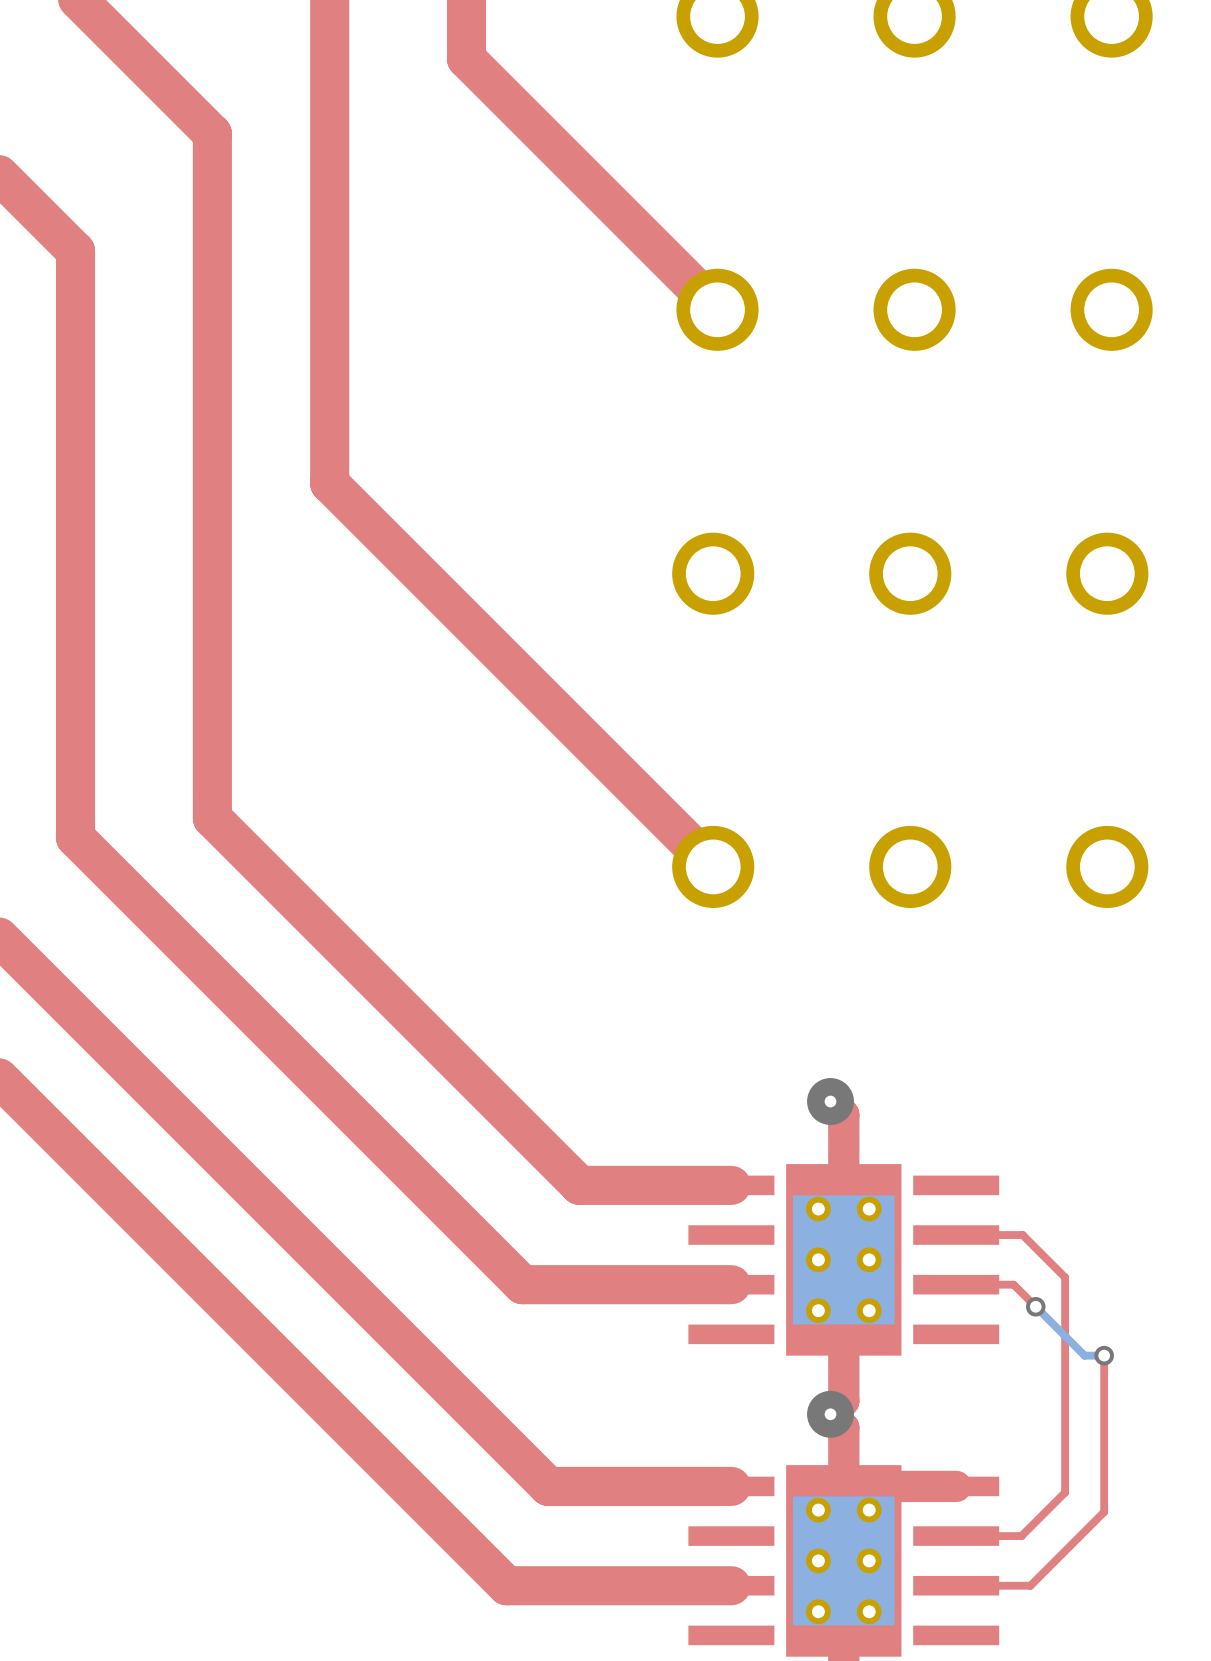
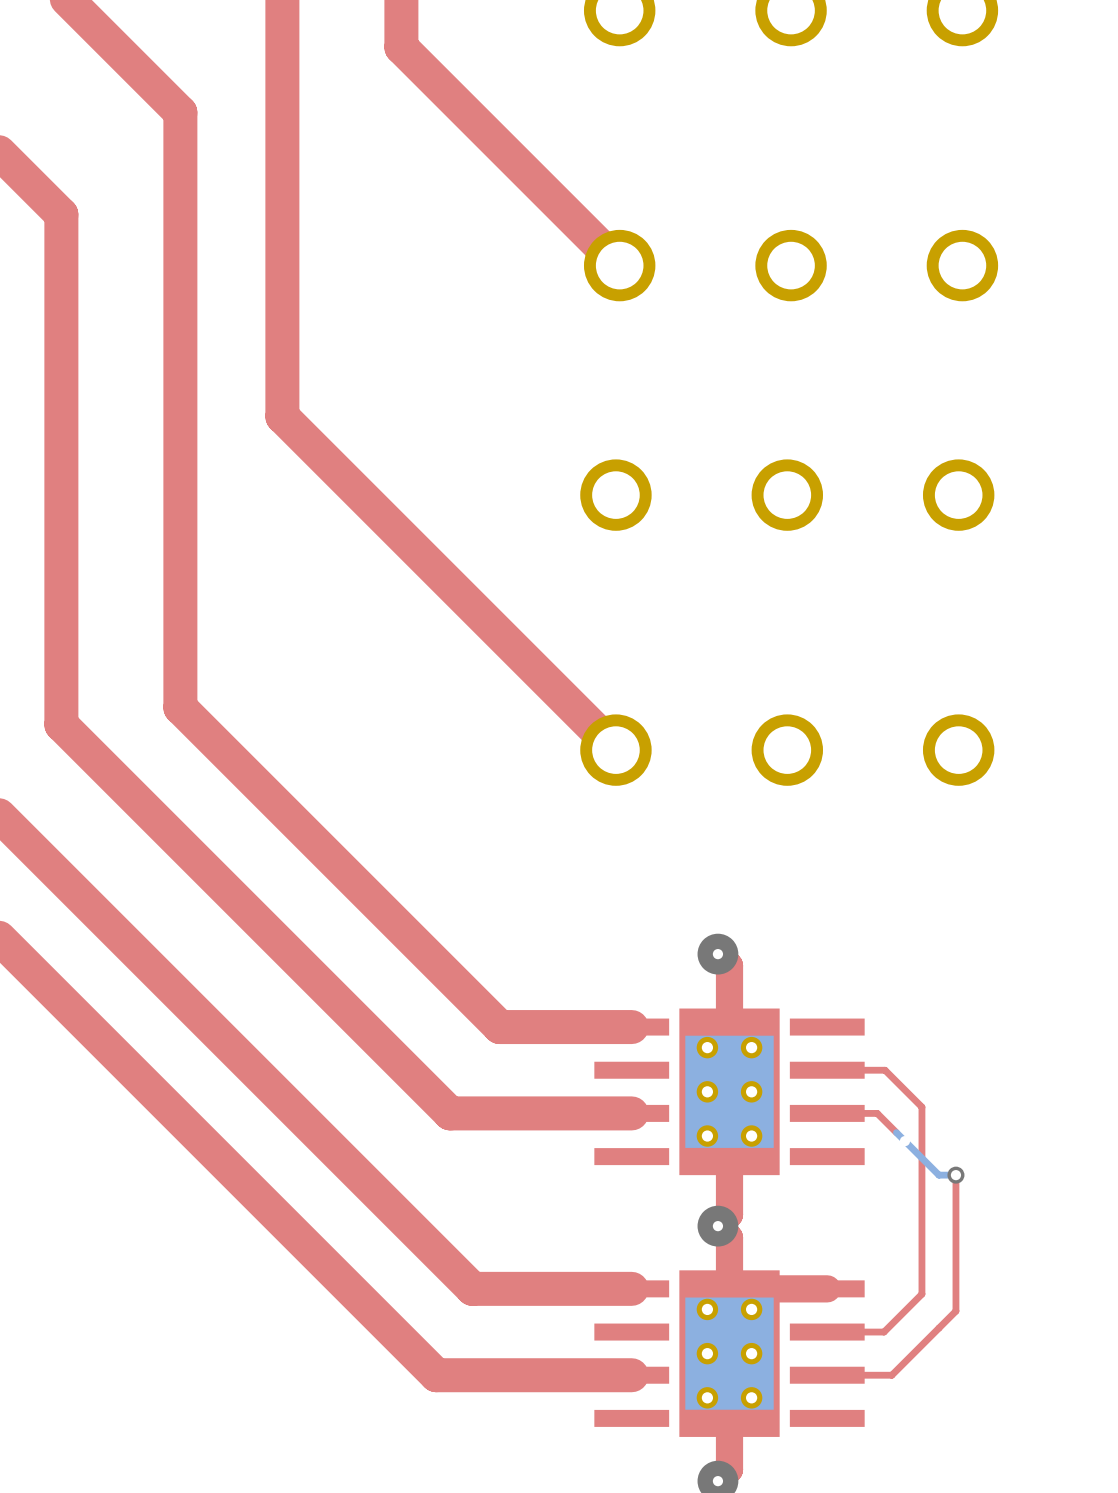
via size: [1025, 1297, 1046, 1317] -> [899, 1136, 911, 1147]

